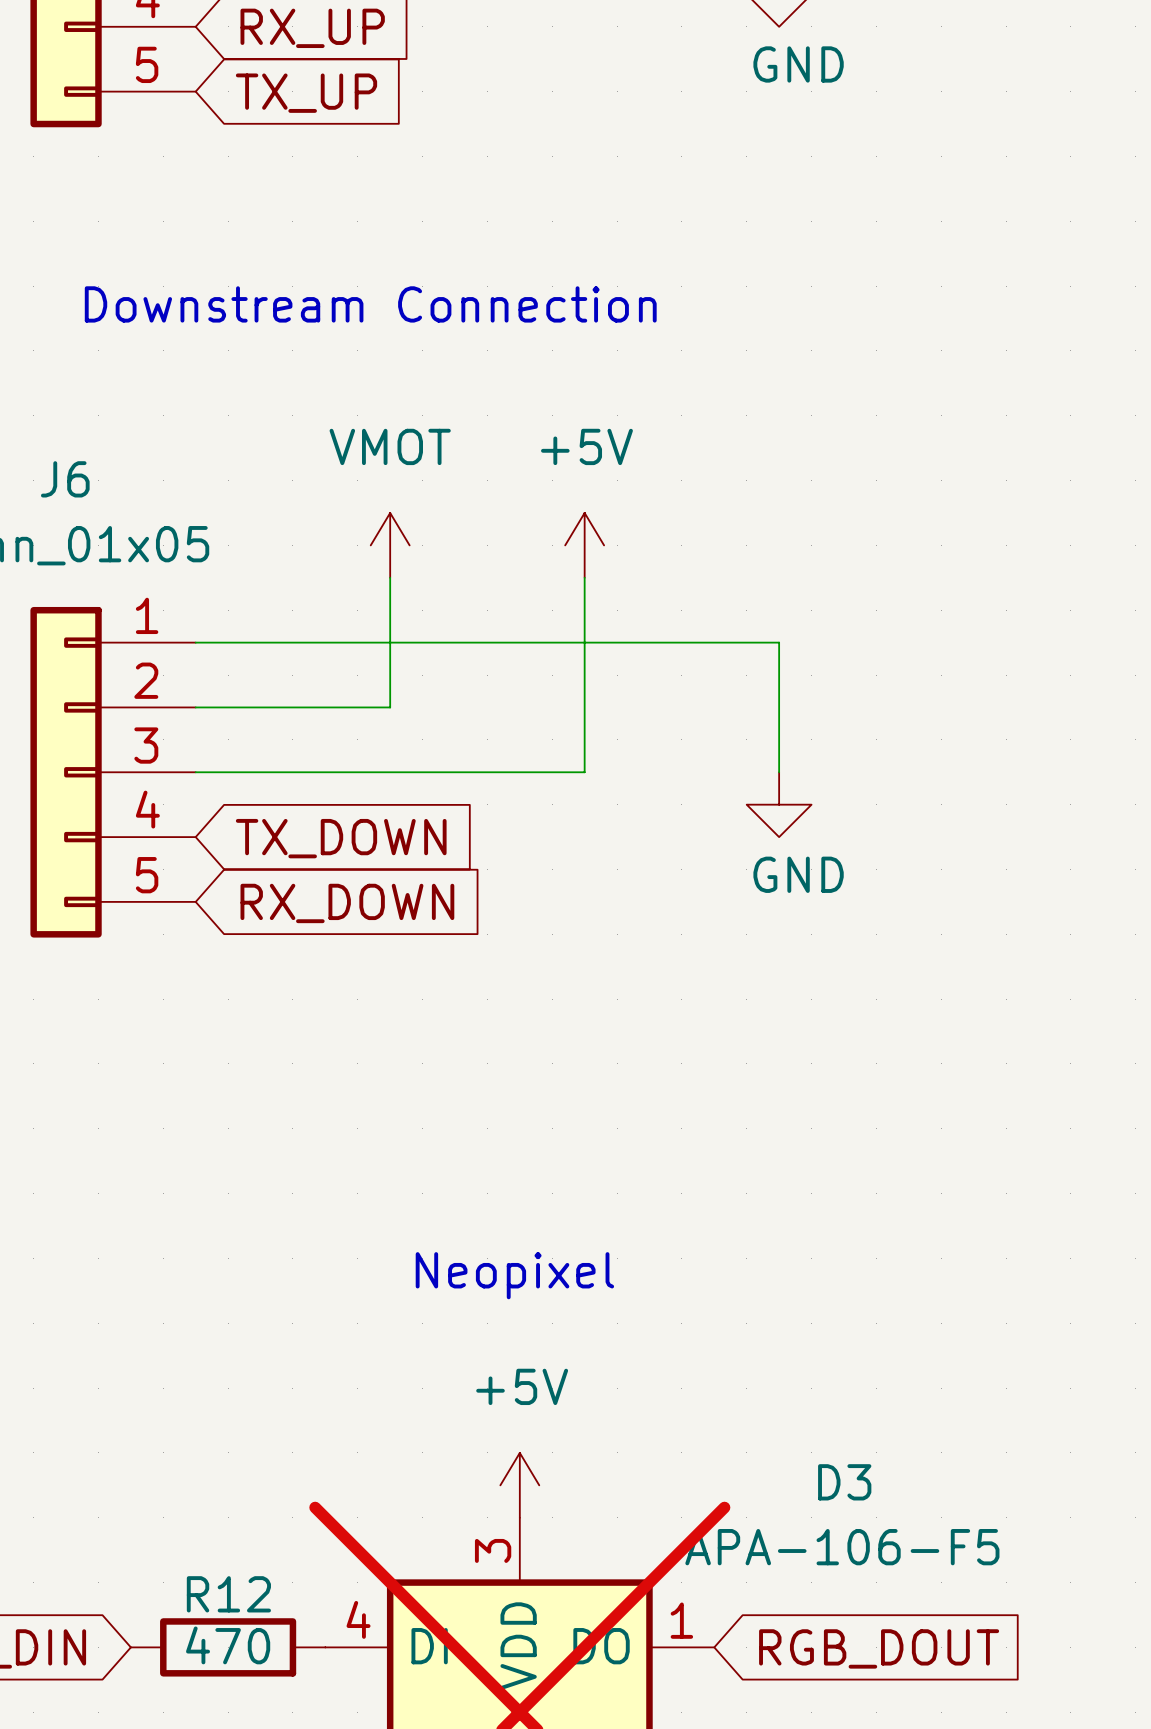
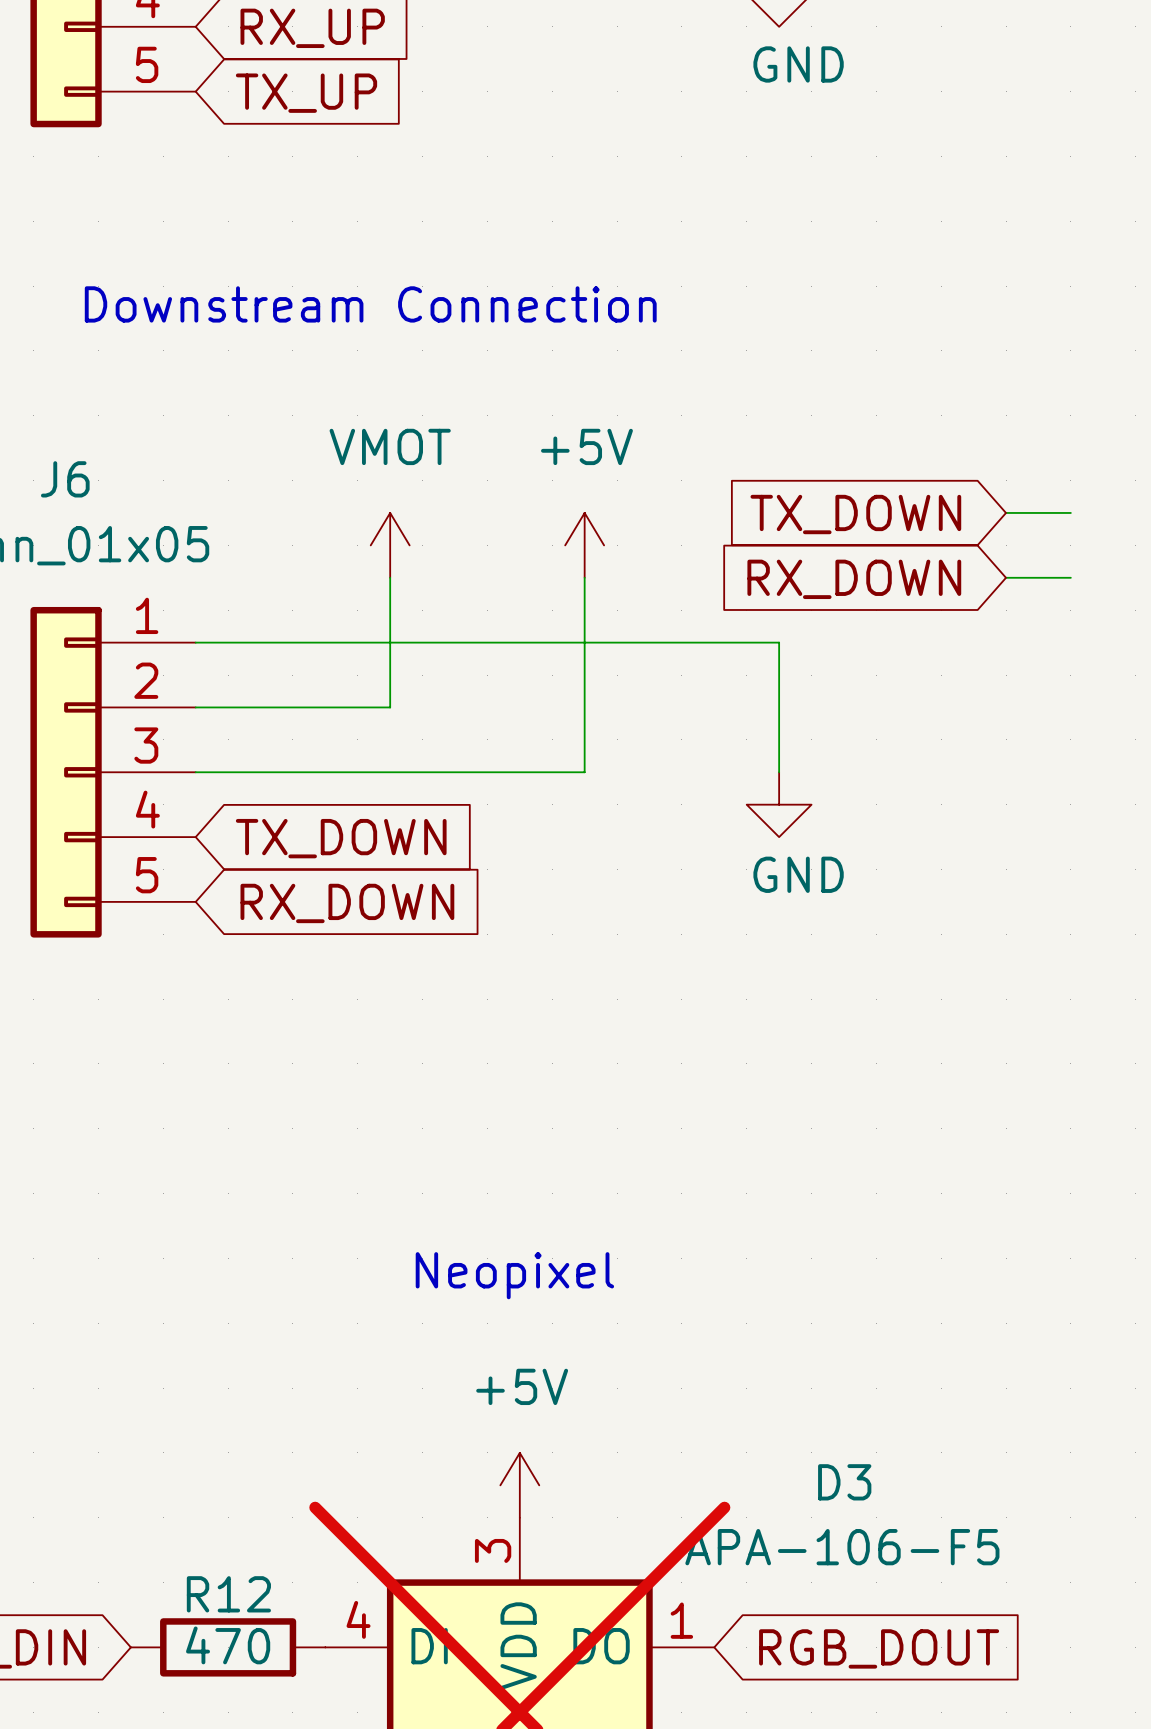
wire: none -> (1006, 512) (1070, 512)
global label: none -> TX_DOWN (855, 514)
wire: none -> (1006, 577) (1070, 577)
global label: none -> RX_DOWN (854, 579)

